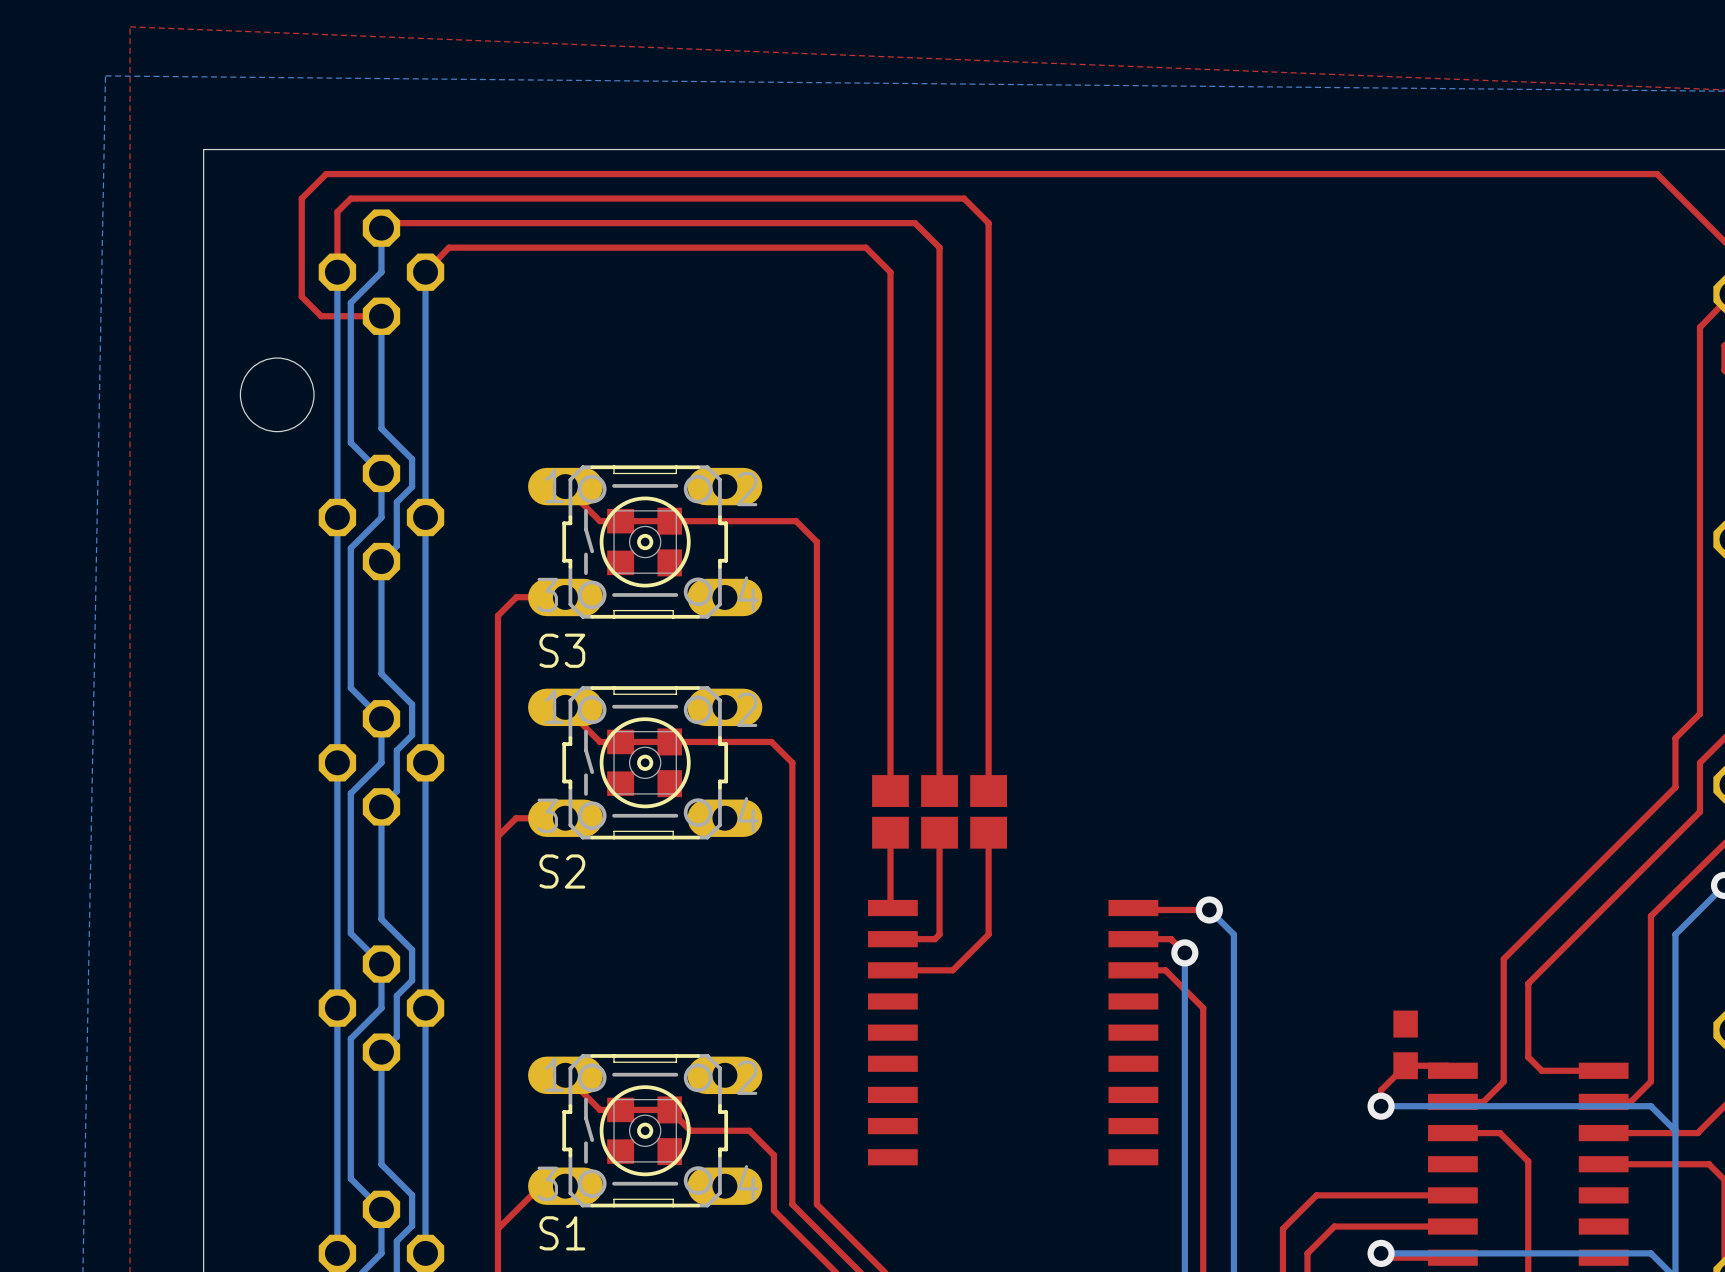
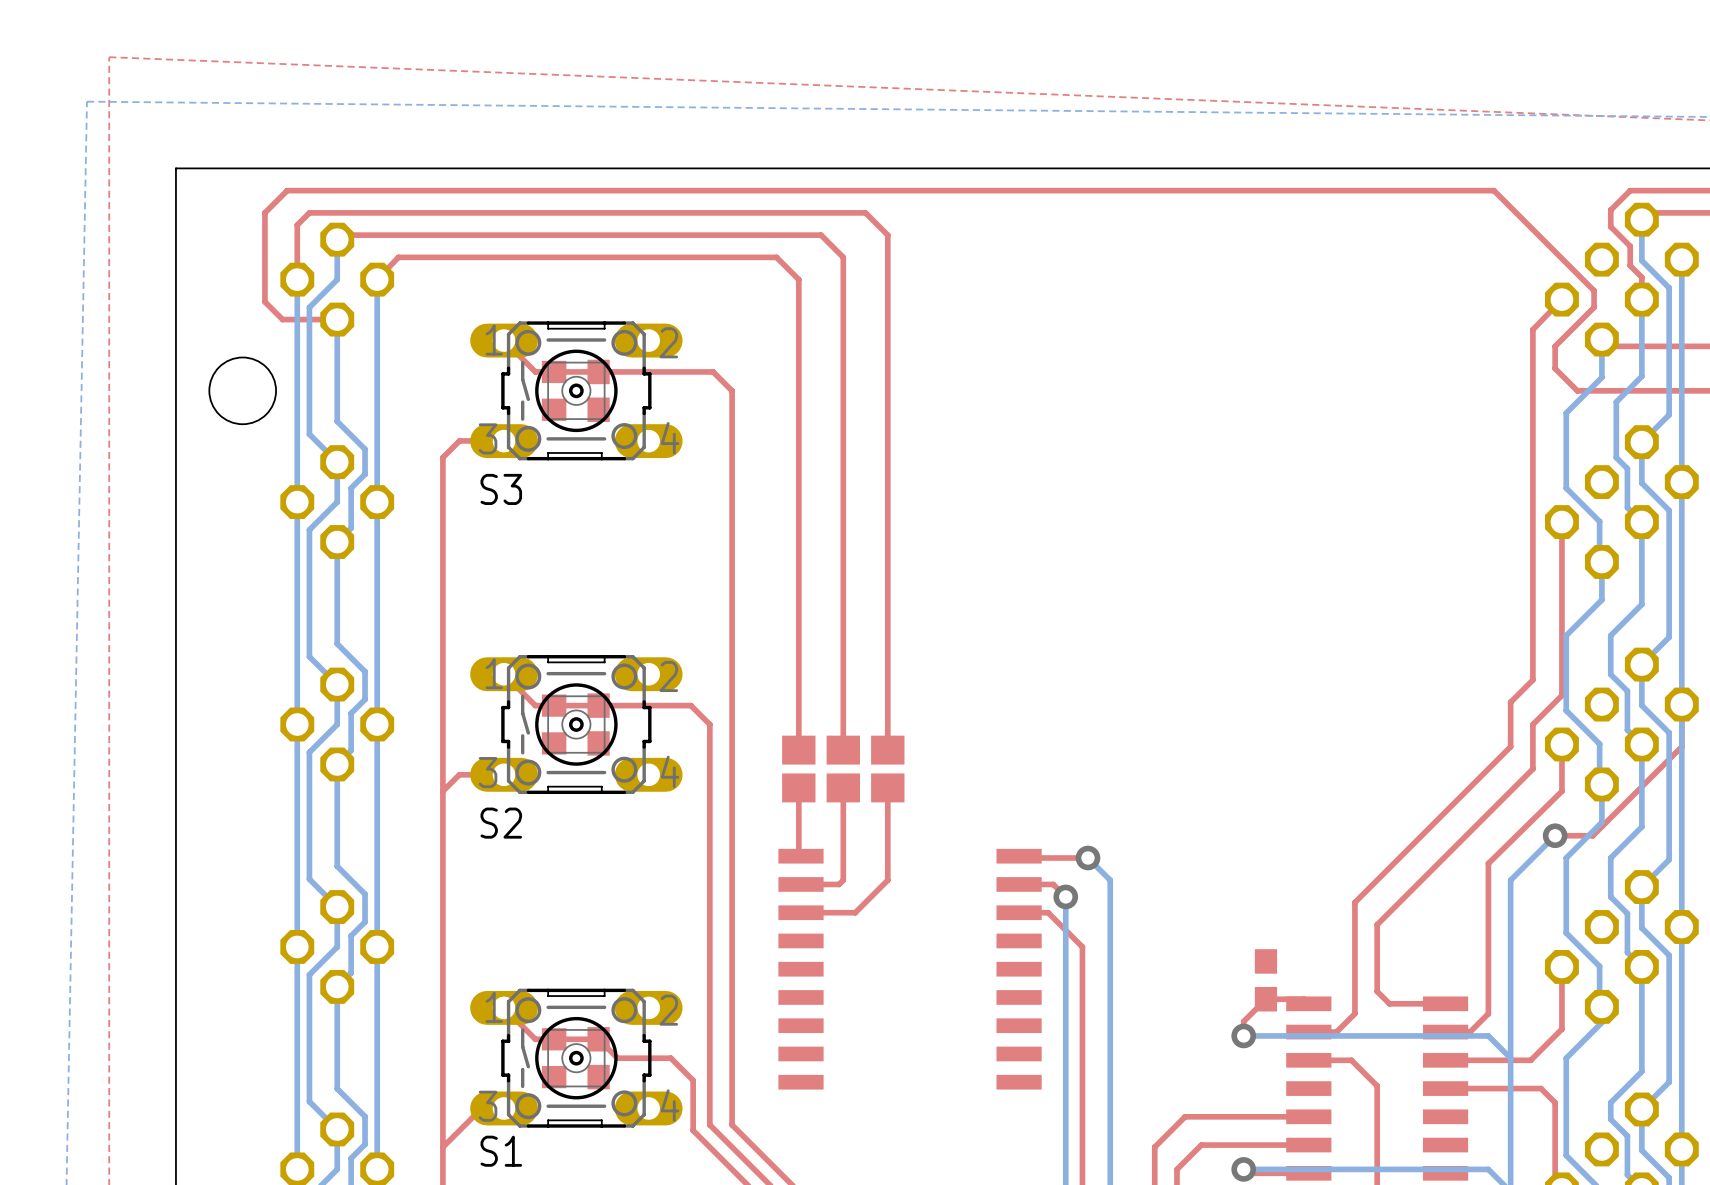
top track: (565, 486) (600, 521) (796, 521) (816, 542) -> (504, 340) (535, 371) (713, 371) (732, 390) (732, 524)
part position: (620, 542) -> (554, 390)
S3 position: (645, 542) -> (576, 390)
part position: (669, 542) -> (598, 390)
top track: (565, 597) (516, 597) (497, 615) -> (504, 440) (459, 440) (442, 457) (442, 591)

